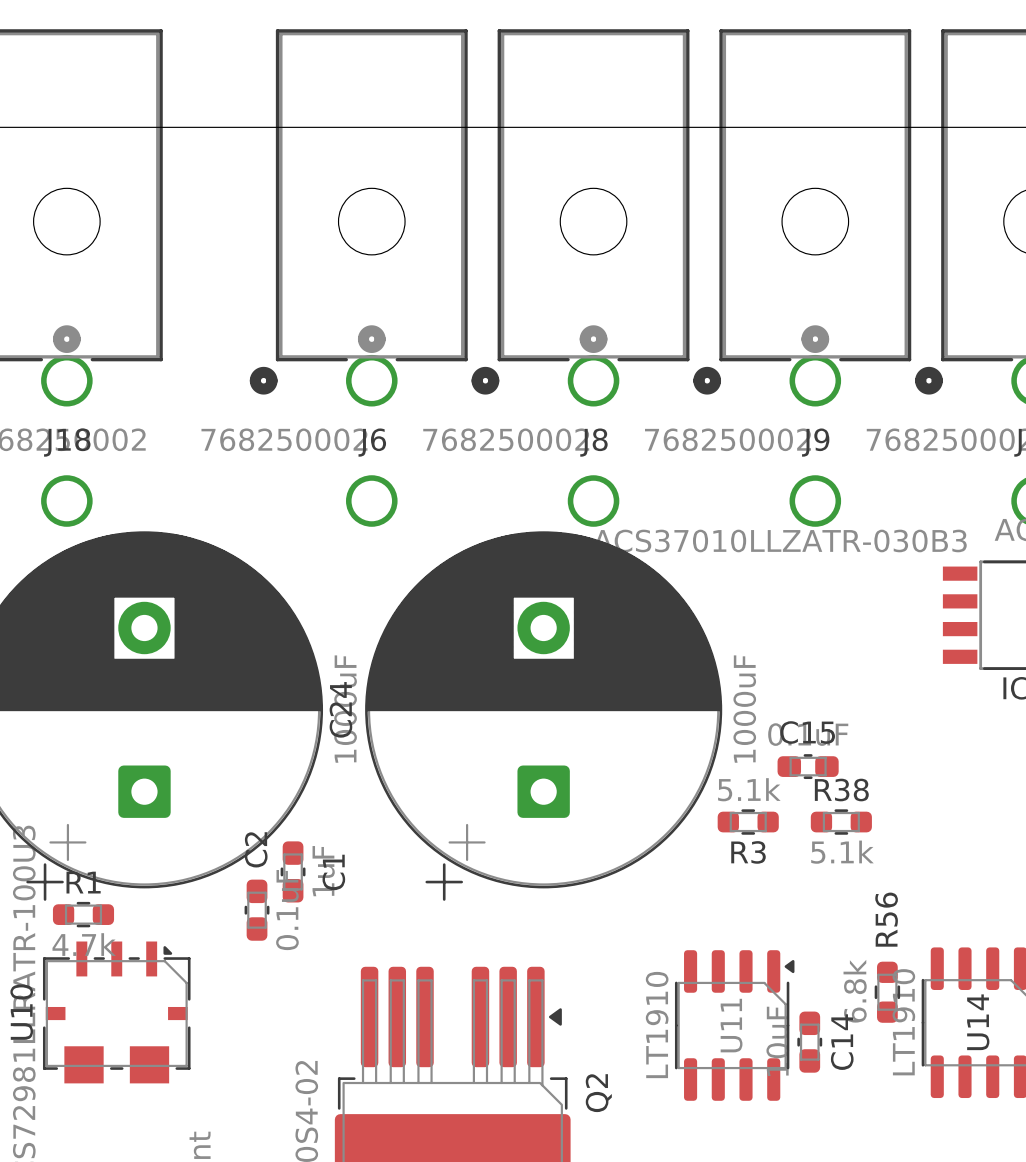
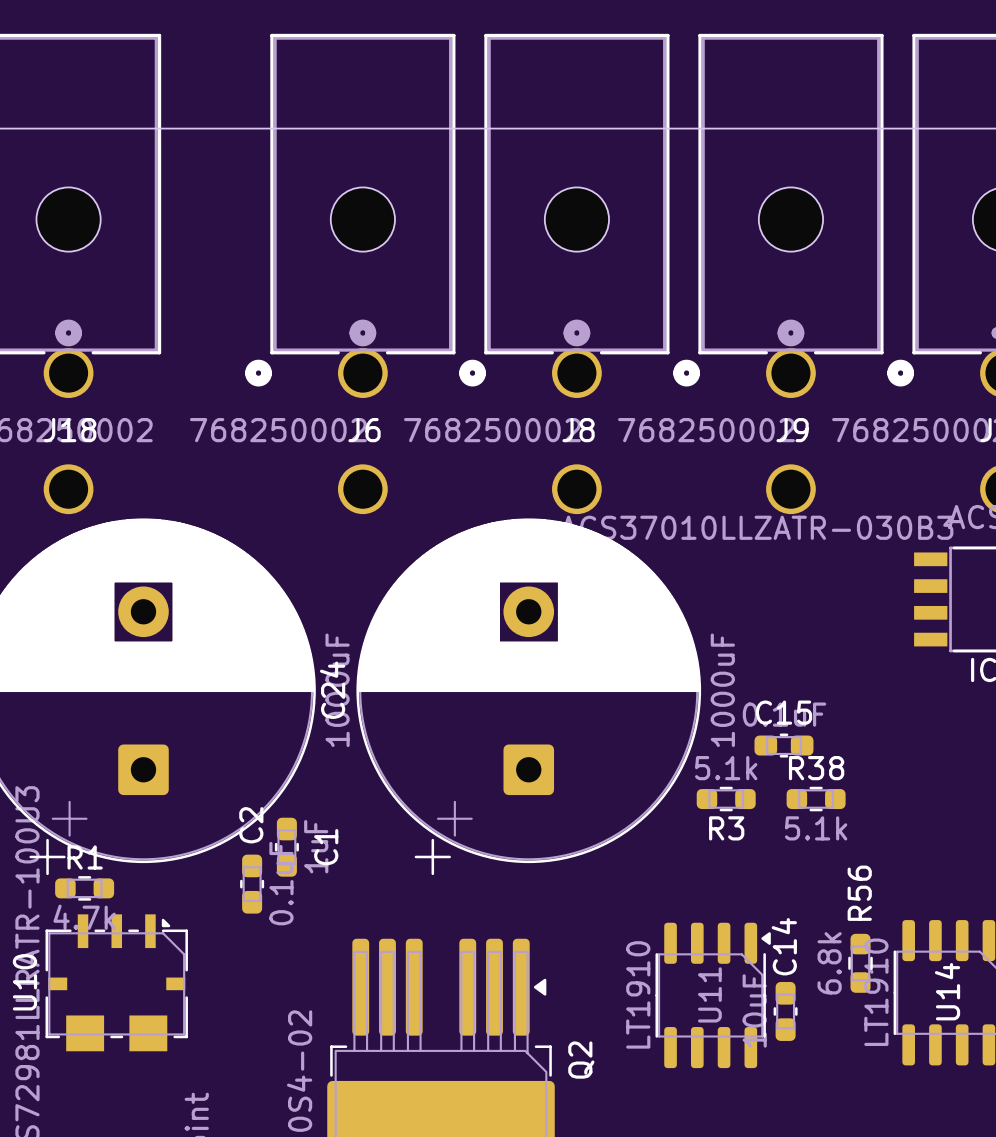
C14 name position: C14 (842, 1042) -> C14 (784, 946)

